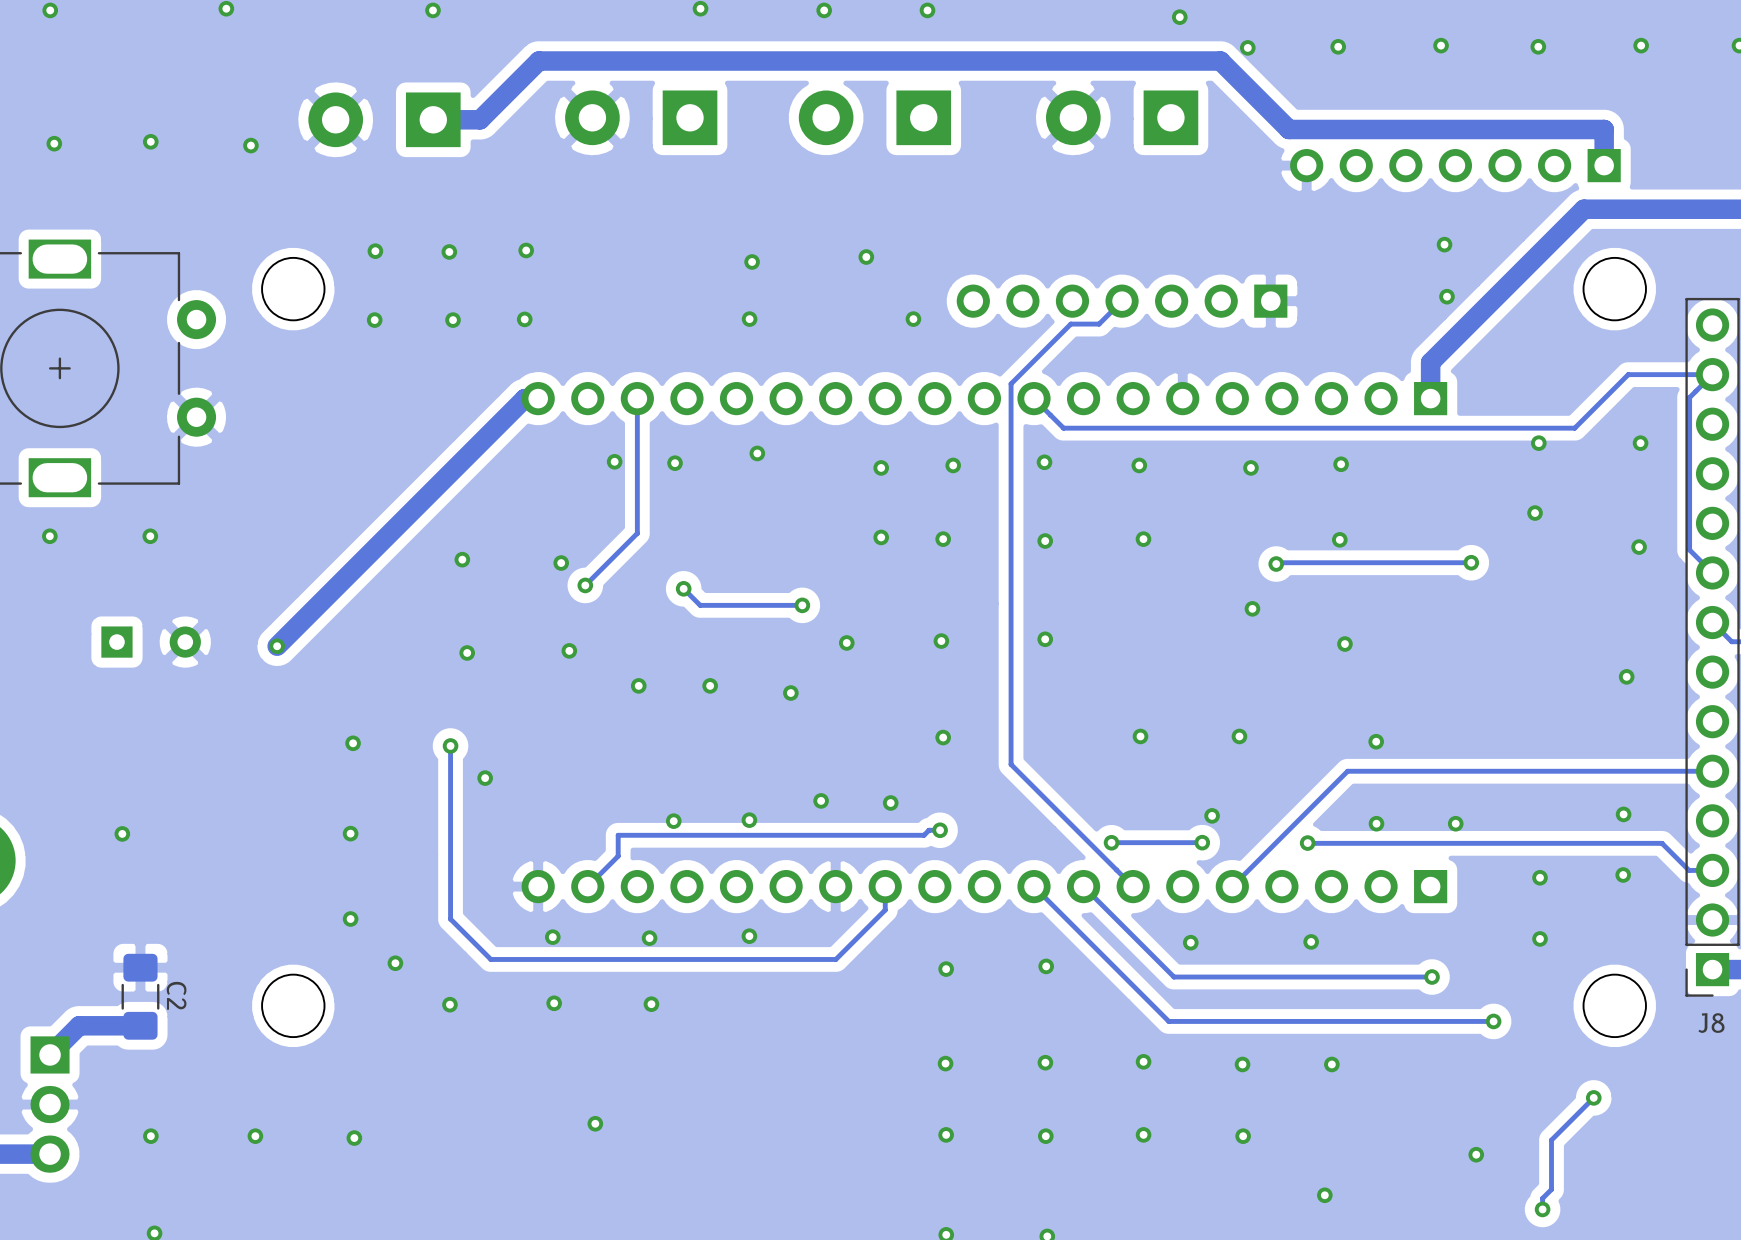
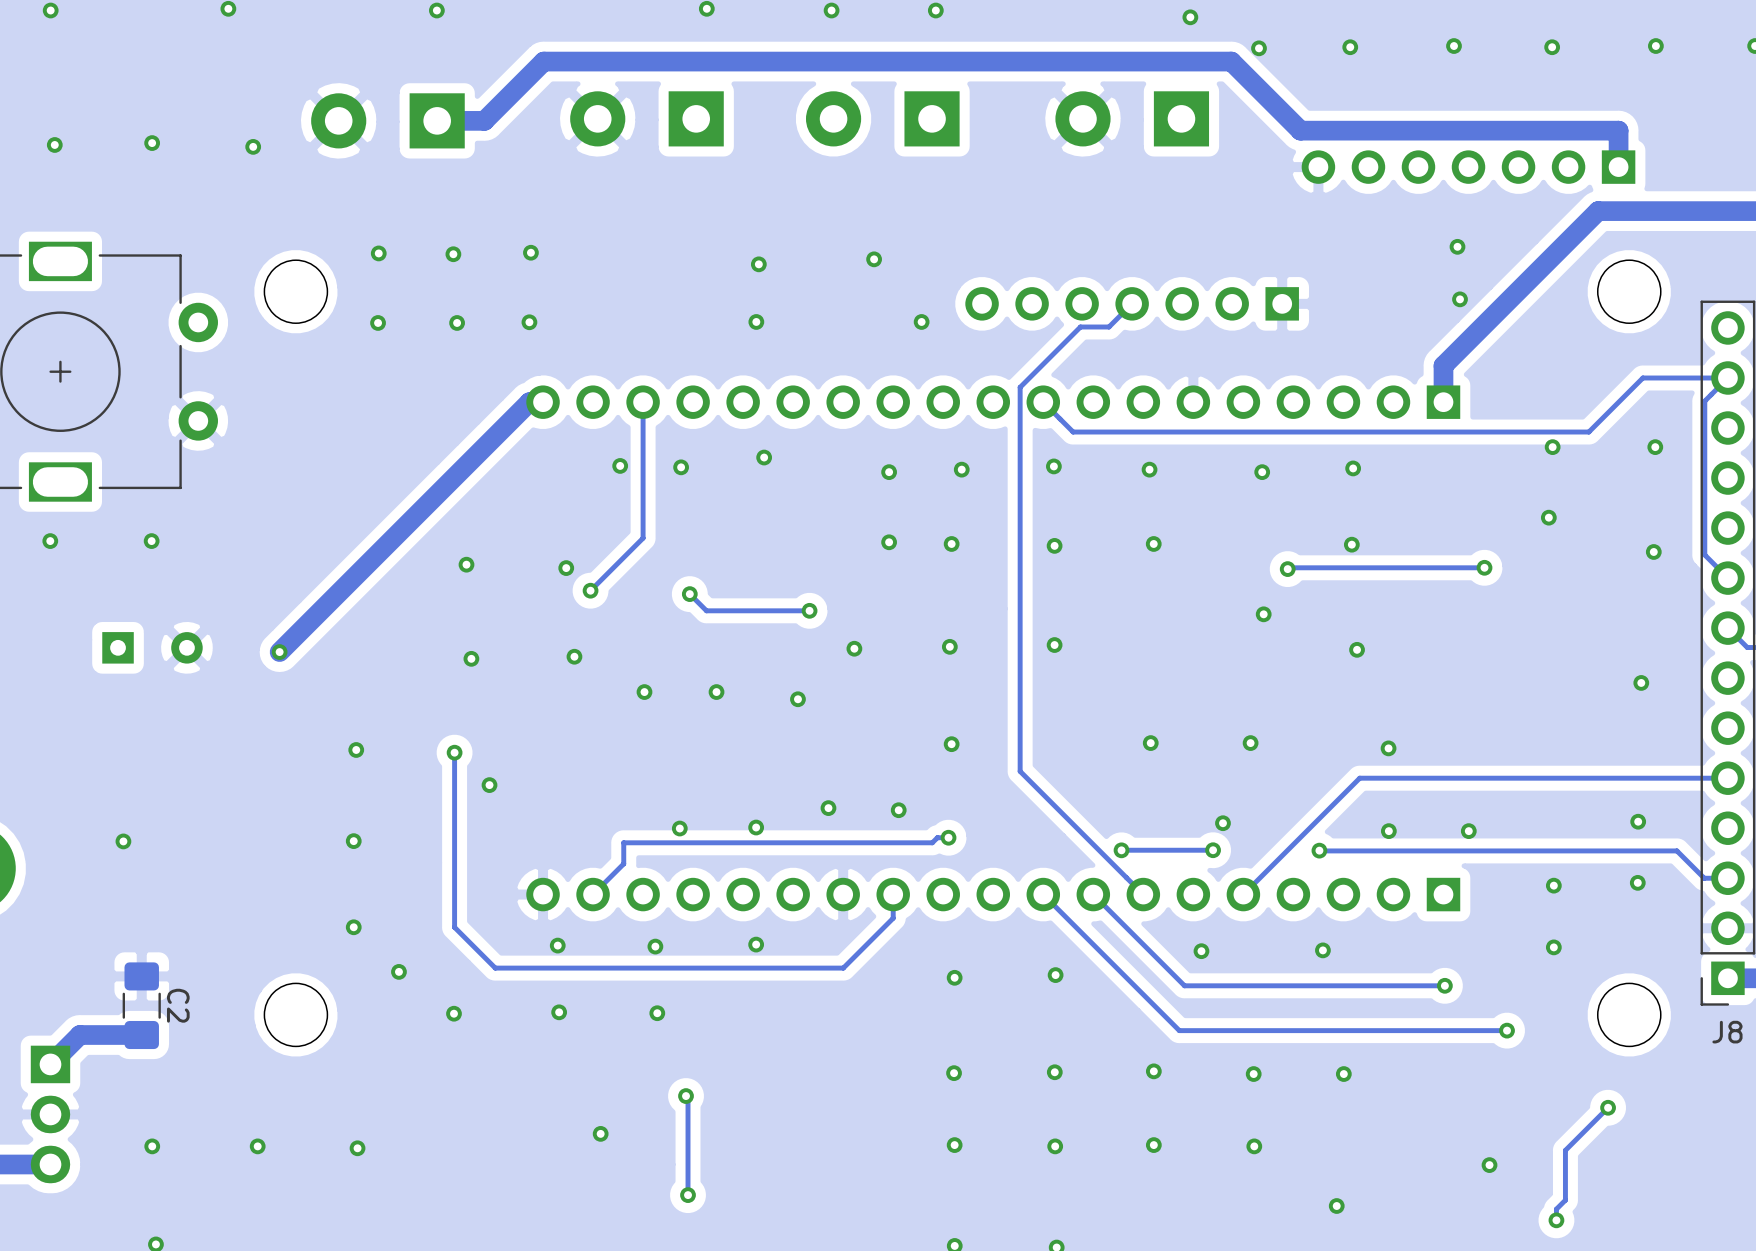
track: none -> (686, 1096) (688, 1098) (688, 1195)
via: none -> (686, 1096)
via: none -> (688, 1195)

